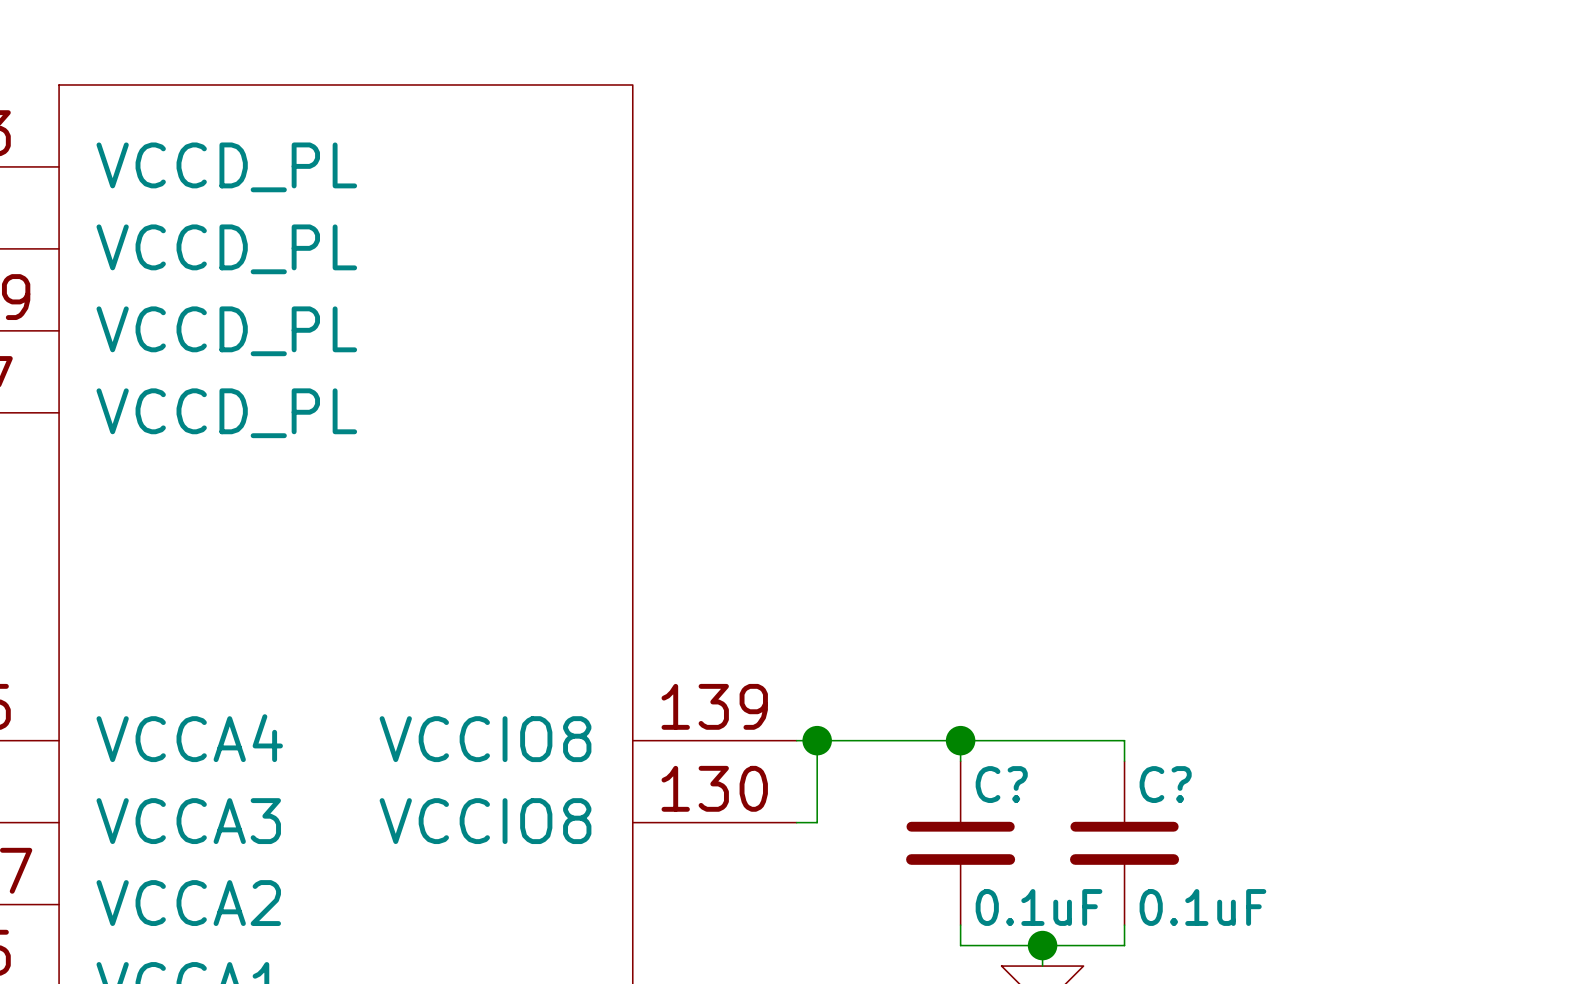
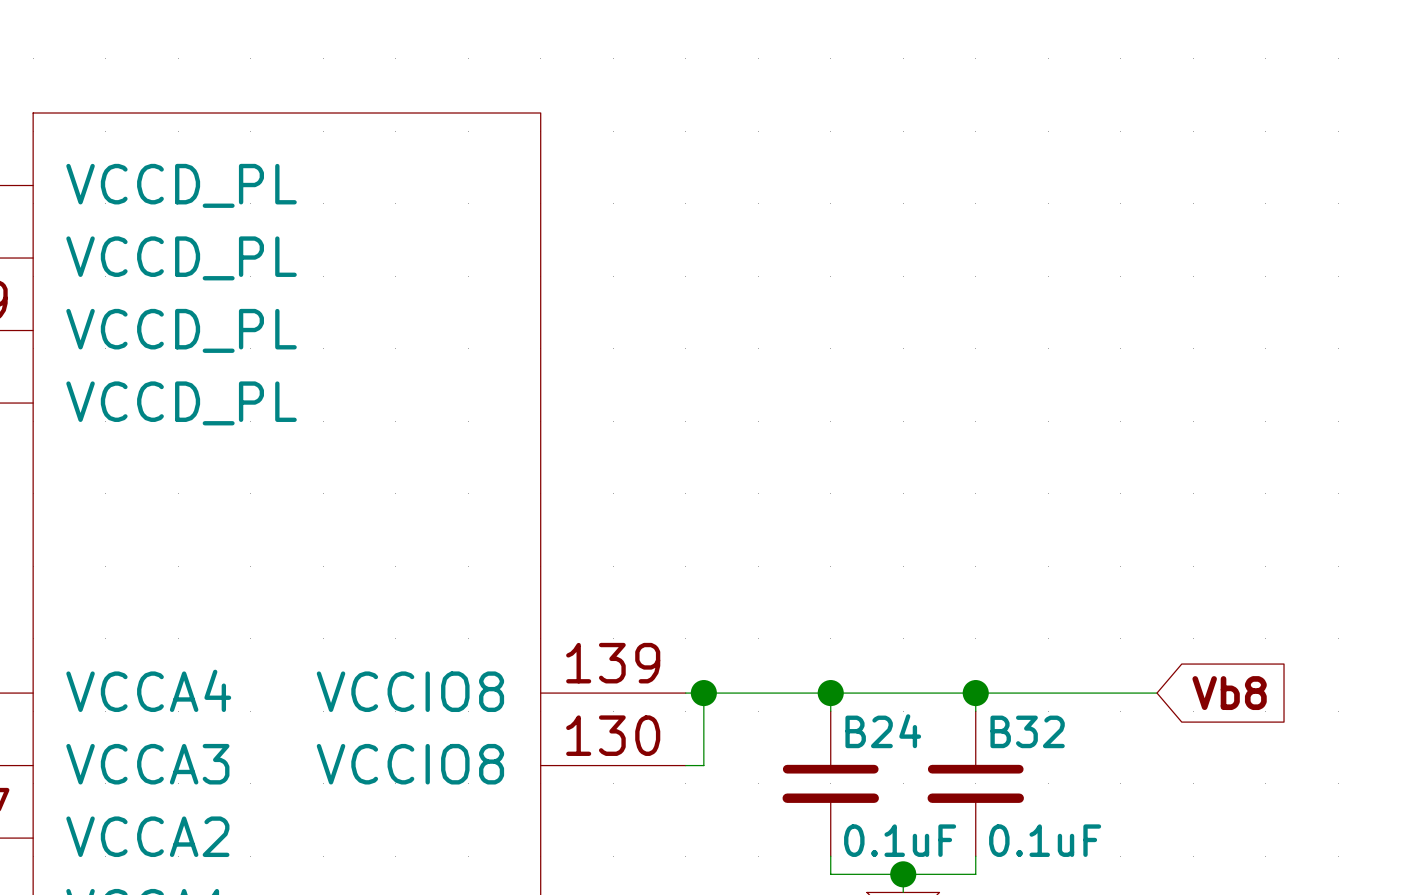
wire: none -> (975, 693) (1157, 693)
junction: none -> (975, 693)
global label: none -> Vb8 (1229, 693)
C? name: C? (1001, 784) -> B24 (883, 731)
C? name: C? (1165, 784) -> B32 (1027, 731)

